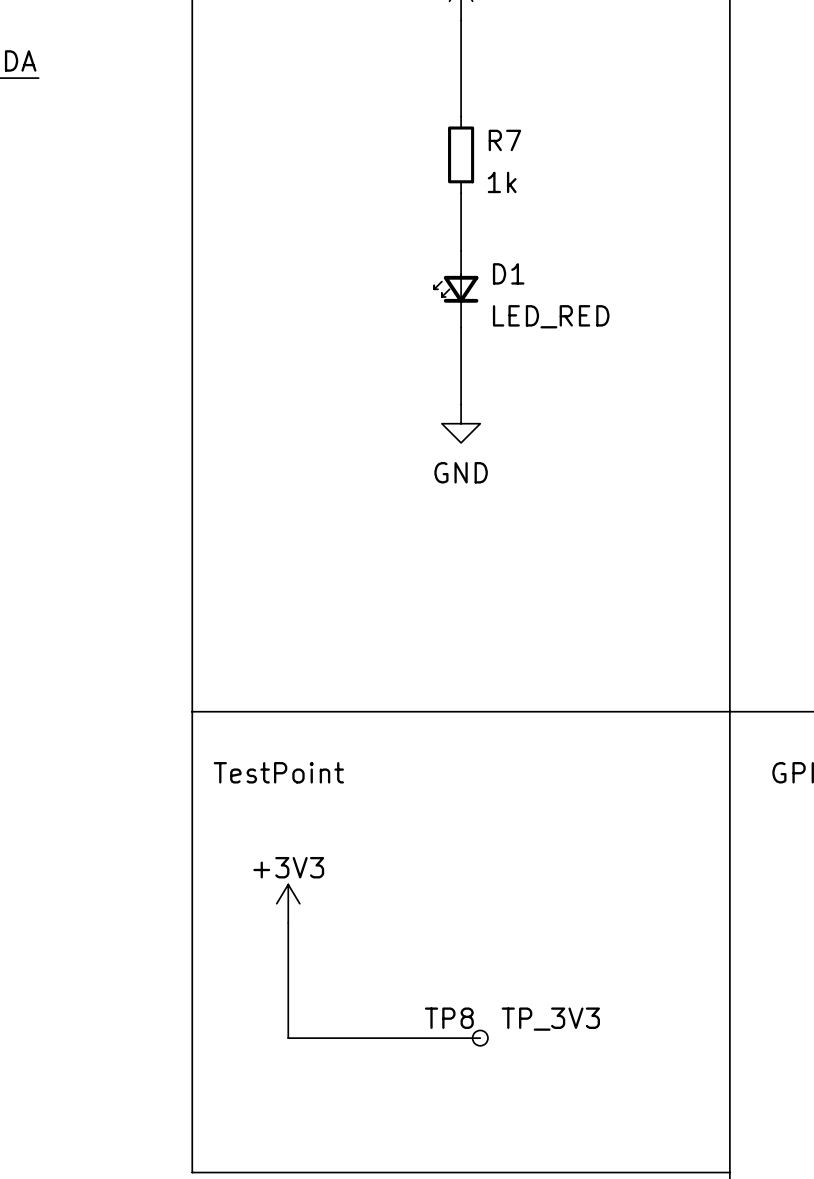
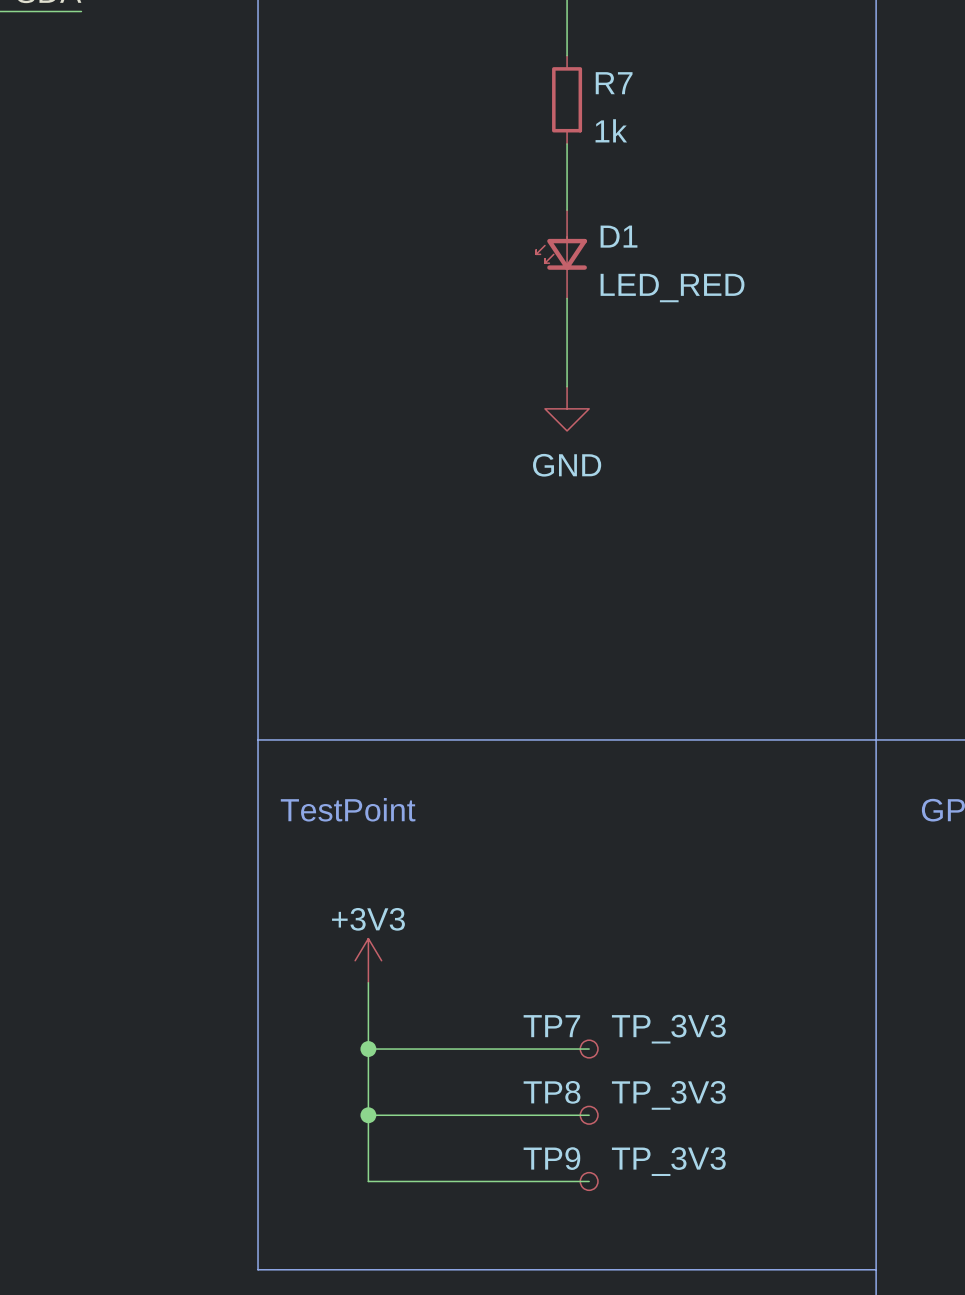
wire: none -> (368, 1049) (589, 1049)
junction: none -> (368, 1049)
TP7: none -> TP_3V3 (589, 1049)
wire: none -> (368, 1115) (368, 1181) (589, 1181)
junction: none -> (368, 1115)
TP9: none -> TP_3V3 (589, 1181)

